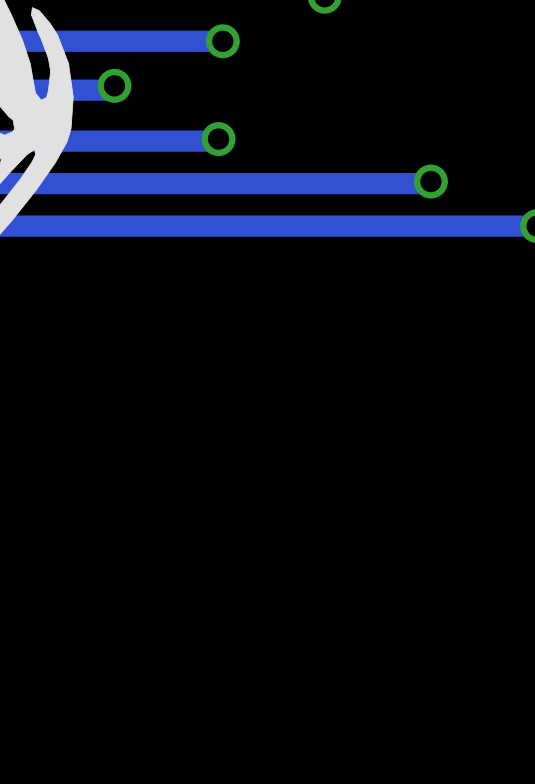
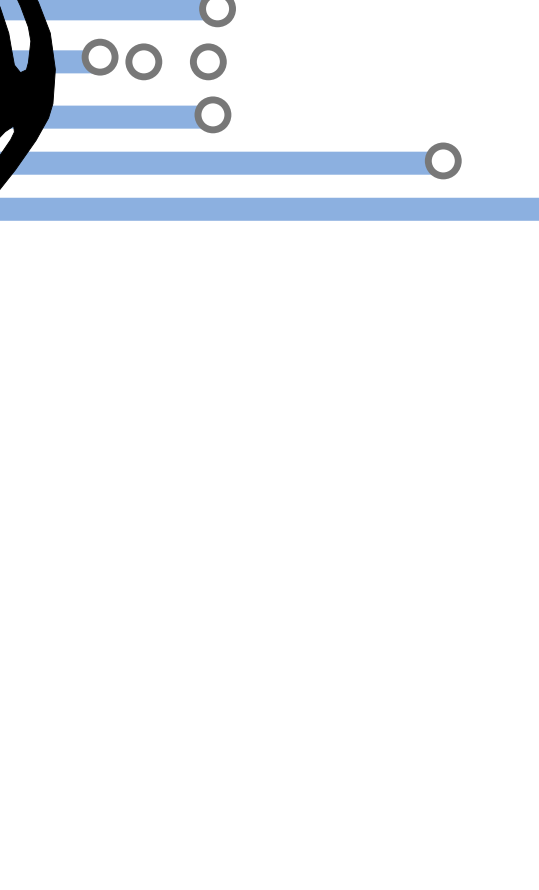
via: none -> (143, 61)
via: none -> (208, 61)

